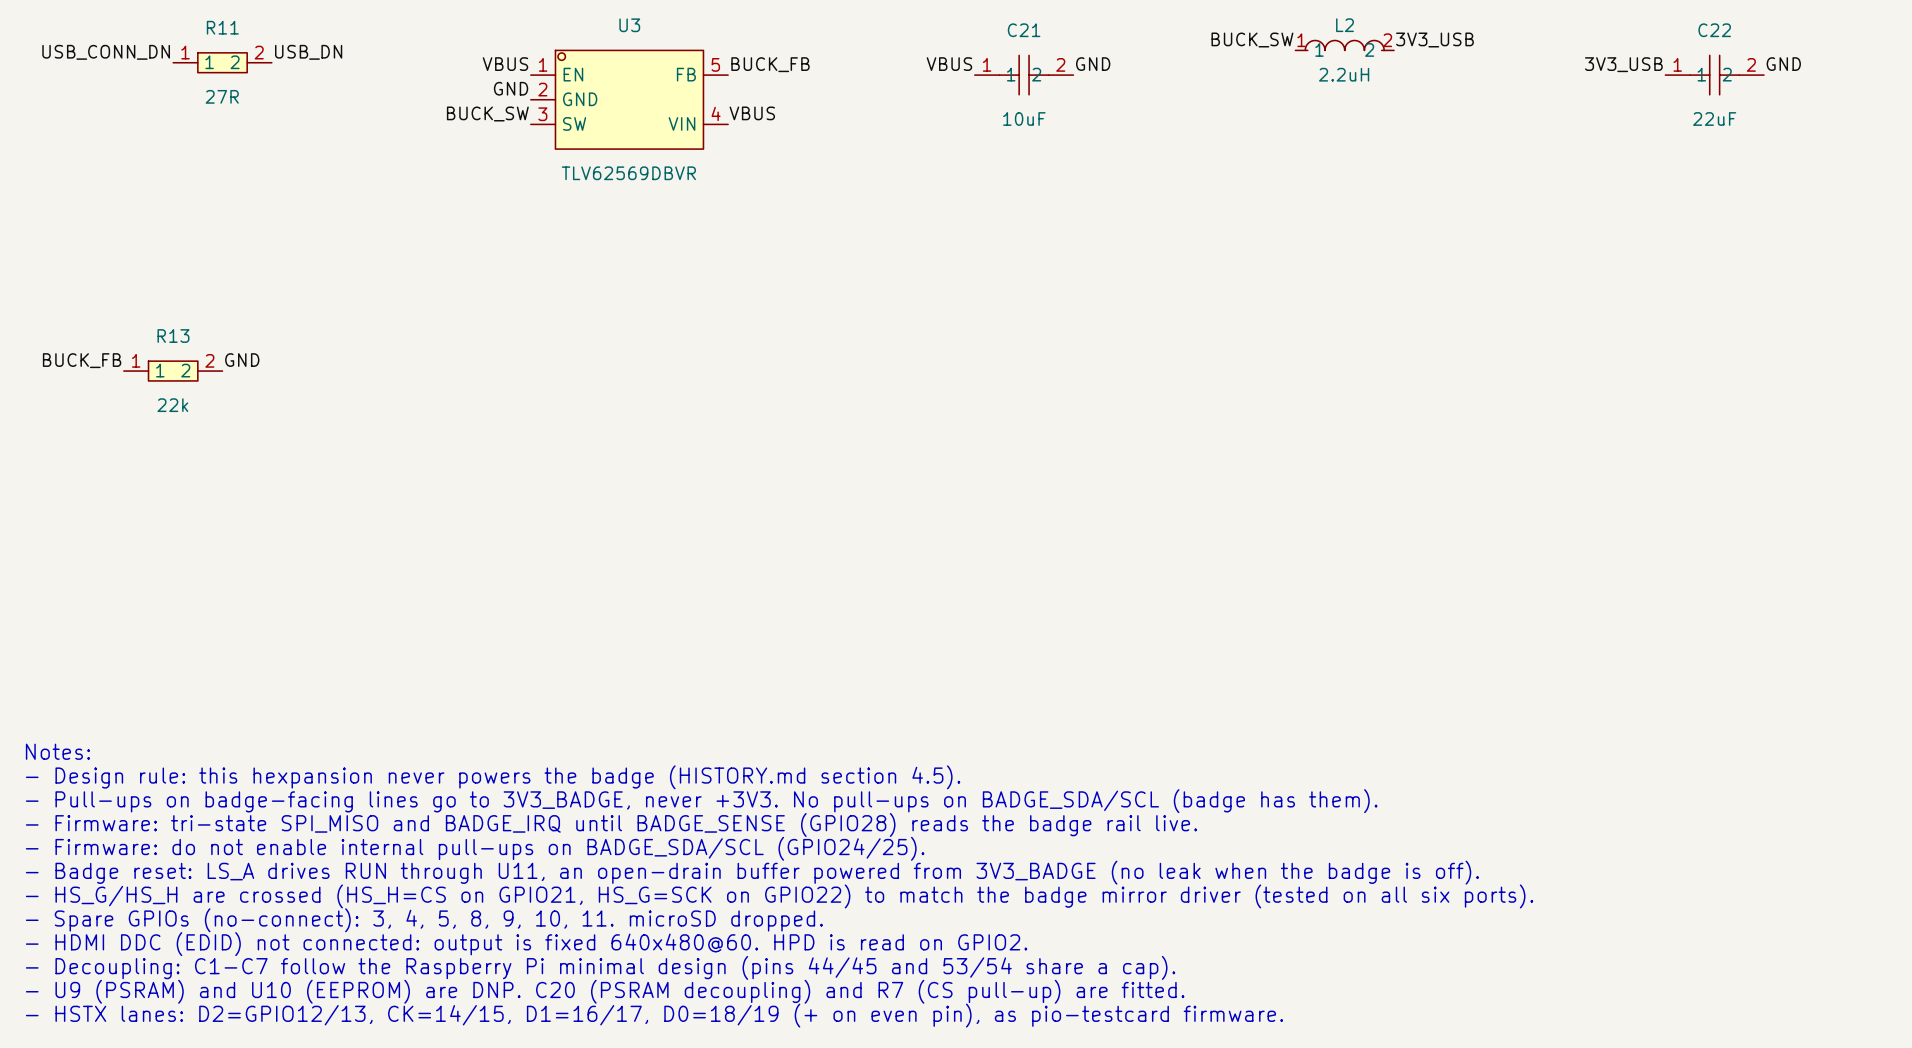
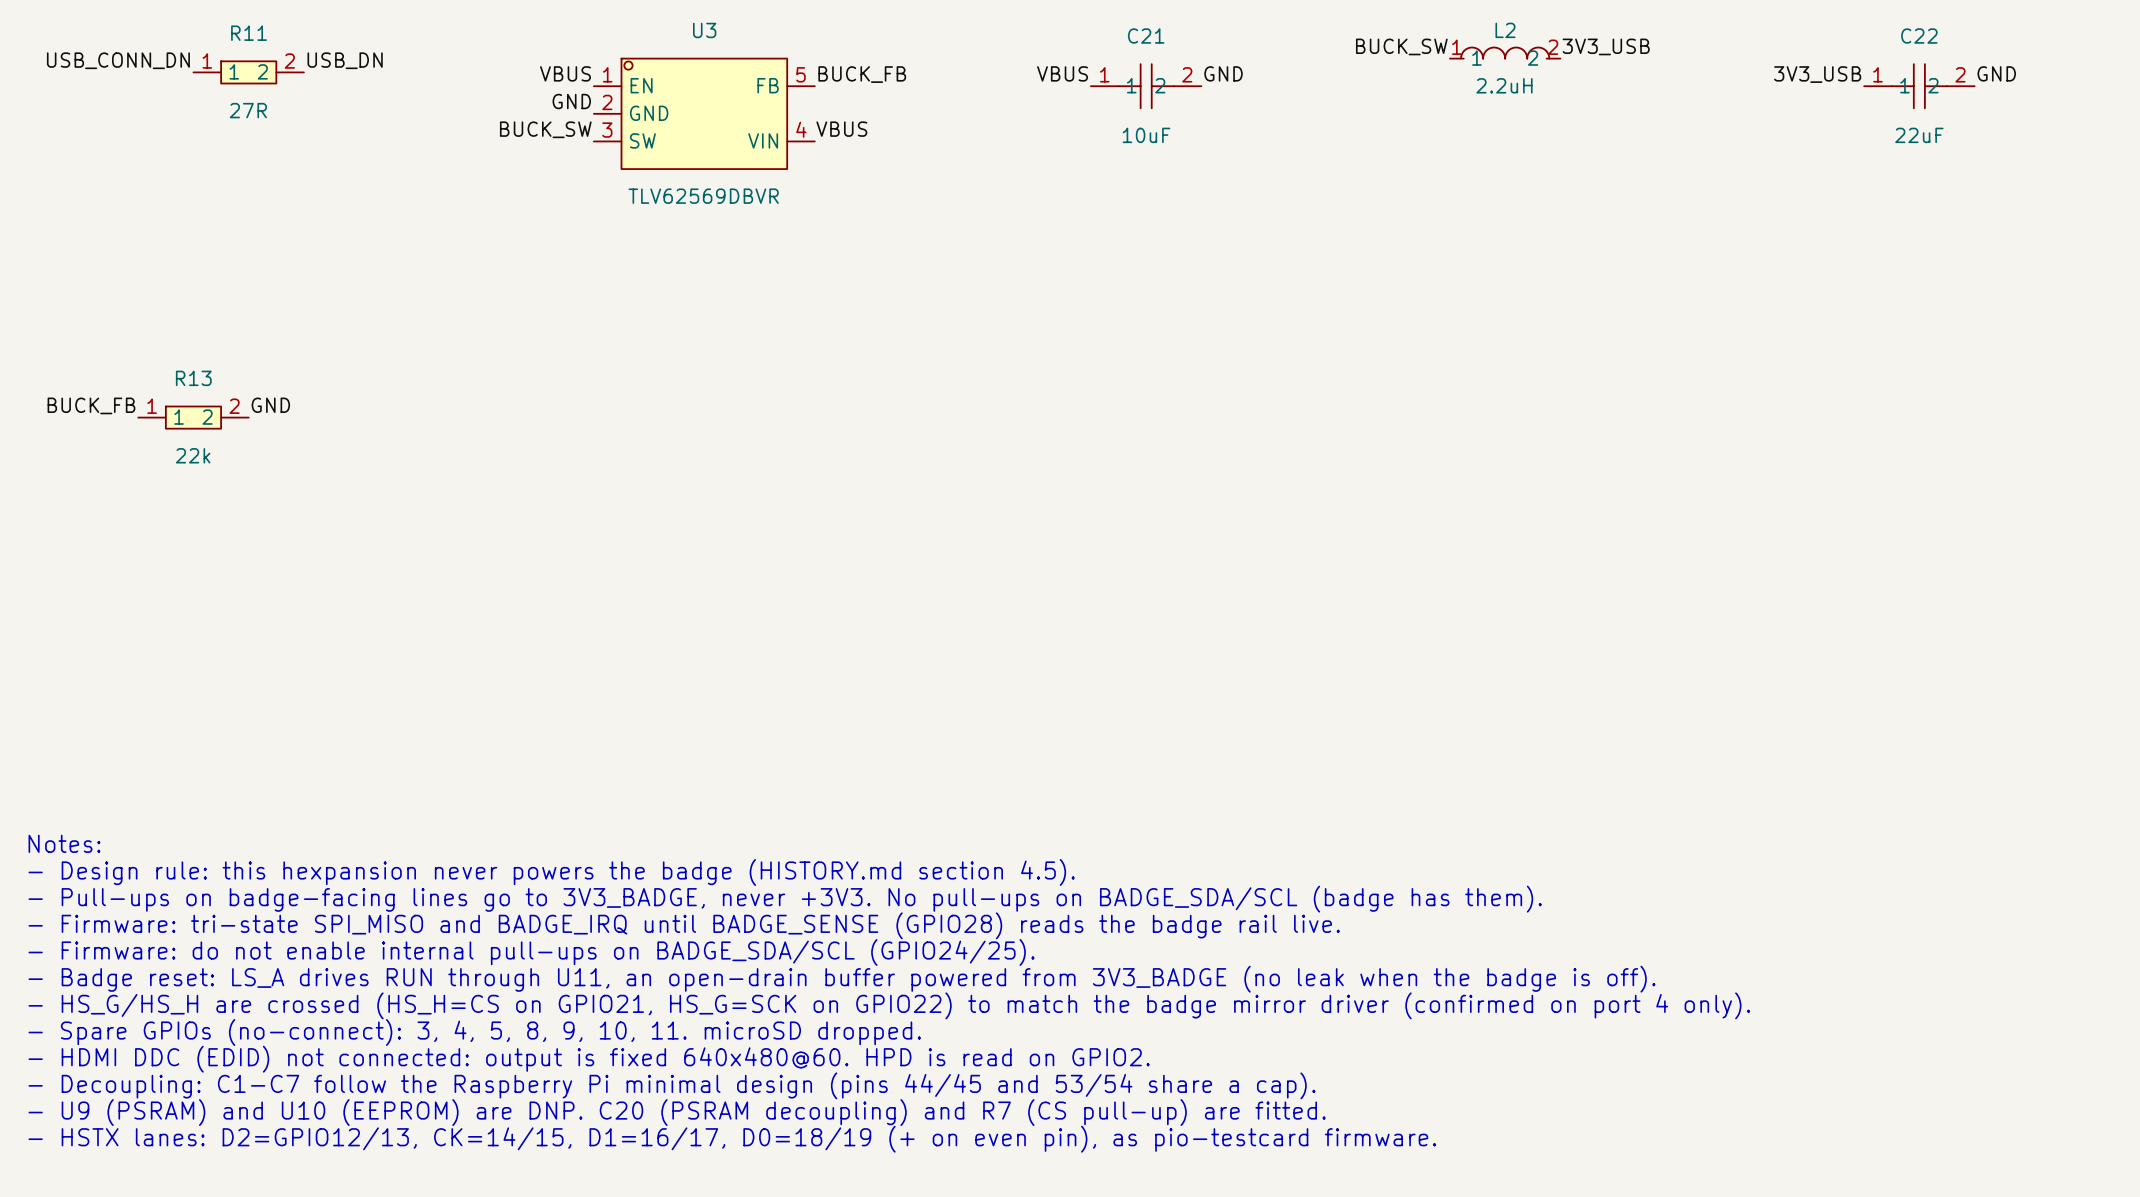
text: - HS_G/HS_H are crossed (HS_H=CS on GPIO21, HS_G=SCK on GPIO22) to match the badge mirror driver (tested on all six ports). (779, 896) -> - HS_G/HS_H are crossed (HS_H=CS on GPIO21, HS_G=SCK on GPIO22) to match the badge mirror driver (confirmed on port 4 only). (889, 1005)

